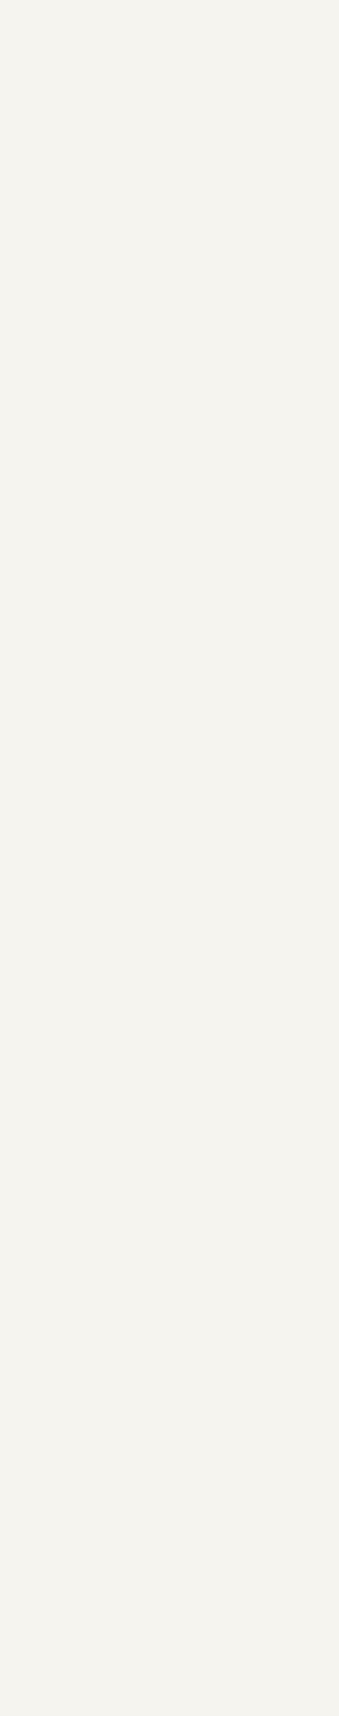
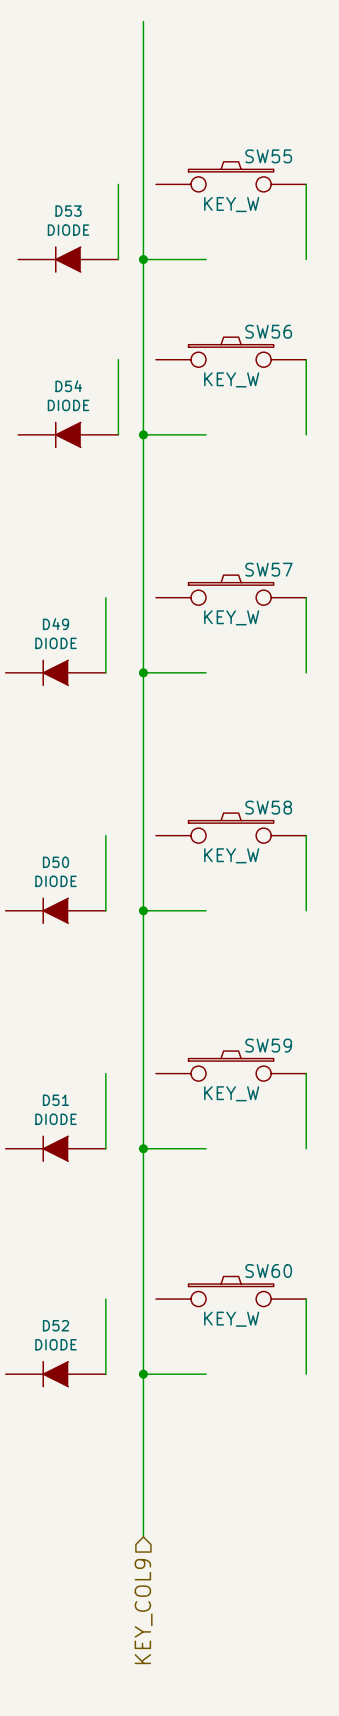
wire: none -> (143, 21) (143, 1537)
SW55: none -> KEY_W (231, 176)
wire: none -> (118, 184) (118, 259)
wire: none -> (306, 184) (306, 259)
D53: none -> DIODE (68, 259)
wire: none -> (143, 259) (206, 259)
junction: none -> (143, 259)
SW56: none -> KEY_W (231, 352)
wire: none -> (118, 359) (118, 434)
wire: none -> (306, 359) (306, 434)
D54: none -> DIODE (68, 434)
wire: none -> (143, 434) (206, 434)
junction: none -> (143, 434)
SW57: none -> KEY_W (231, 590)
wire: none -> (105, 597) (105, 672)
wire: none -> (306, 597) (306, 672)
D49: none -> DIODE (55, 672)
wire: none -> (143, 672) (206, 672)
junction: none -> (143, 672)
SW58: none -> KEY_W (231, 828)
wire: none -> (105, 835) (105, 910)
wire: none -> (306, 835) (306, 910)
D50: none -> DIODE (55, 910)
wire: none -> (143, 910) (206, 910)
junction: none -> (143, 910)
SW59: none -> KEY_W (231, 1066)
wire: none -> (105, 1073) (105, 1148)
wire: none -> (306, 1073) (306, 1148)
D51: none -> DIODE (55, 1148)
wire: none -> (143, 1148) (206, 1148)
junction: none -> (143, 1148)
SW60: none -> KEY_W (231, 1291)
wire: none -> (105, 1299) (105, 1374)
wire: none -> (306, 1299) (306, 1374)
D52: none -> DIODE (55, 1374)
wire: none -> (143, 1374) (206, 1374)
junction: none -> (143, 1374)
hierarchical label: none -> KEY_COL9 (143, 1611)

